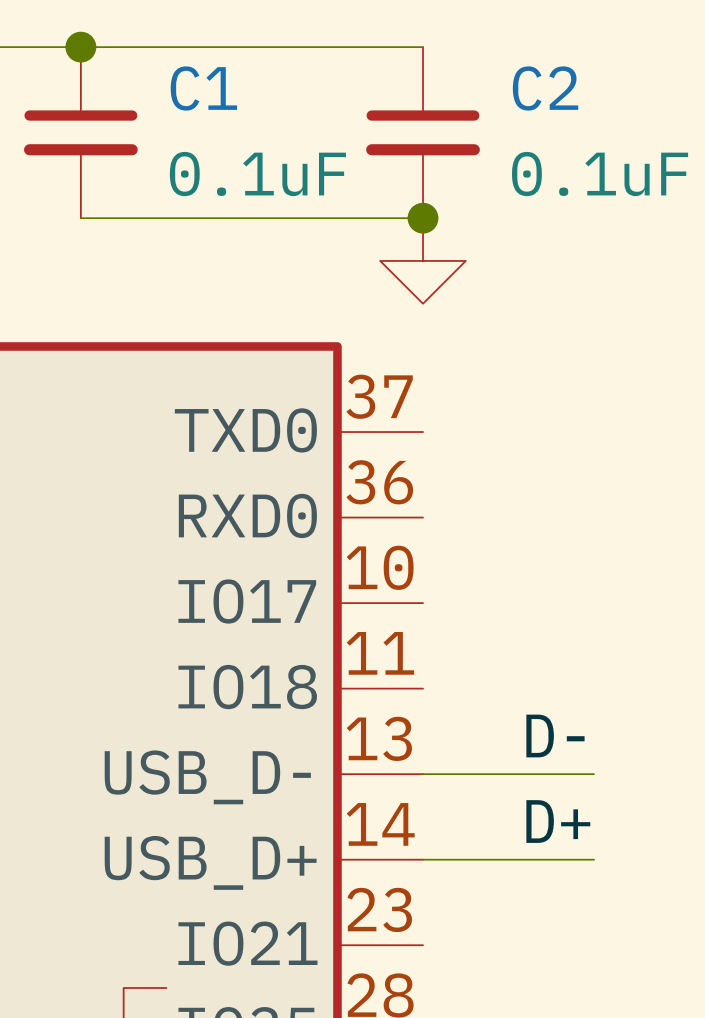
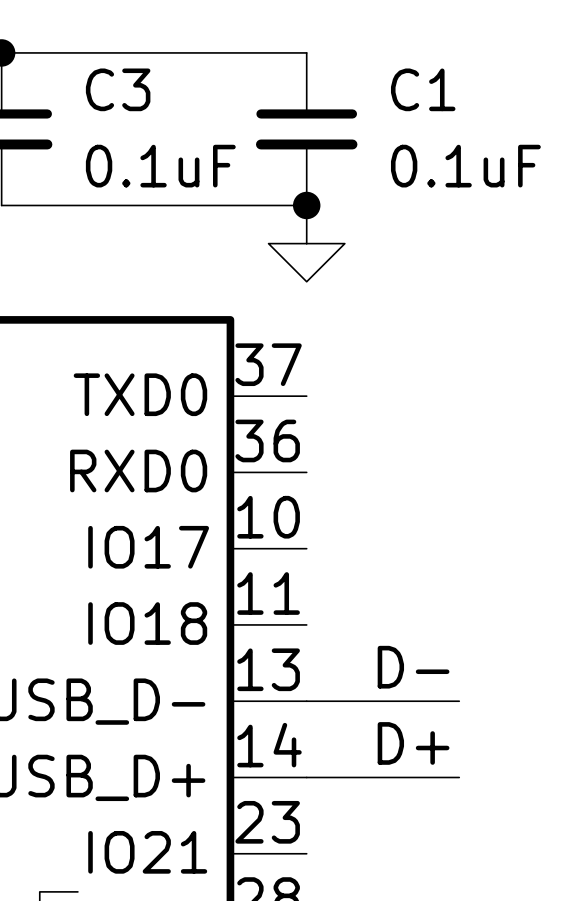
C1 name: C1 (203, 88) -> C3 (118, 89)
C2 name: C2 (545, 88) -> C1 (423, 89)

